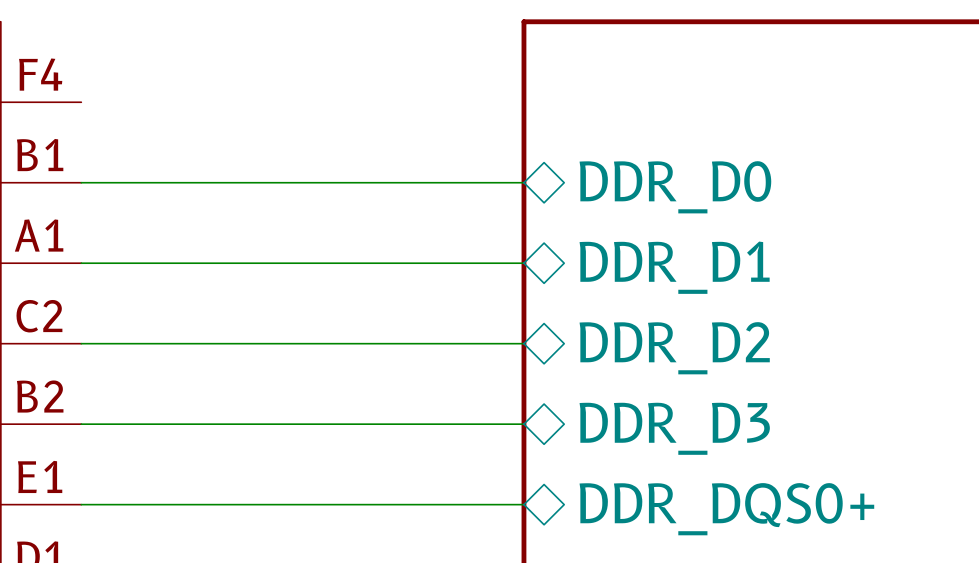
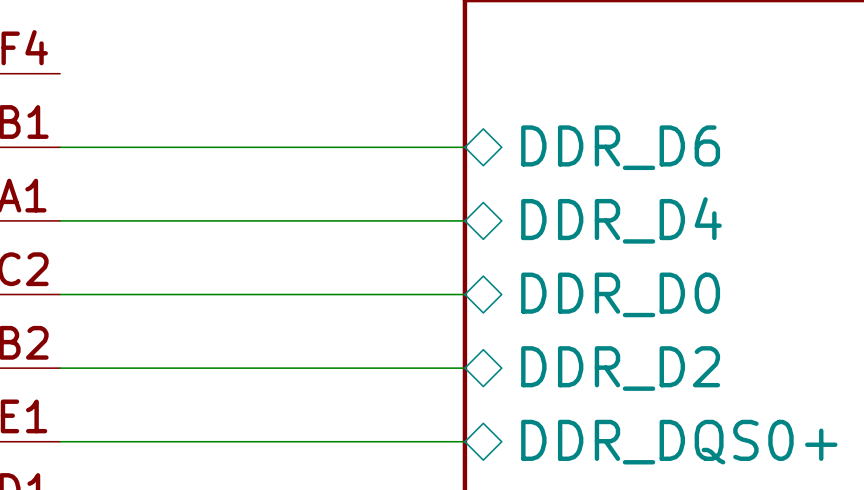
sheet pin: DDR_D0 (675, 187) -> DDR_D6 (620, 147)
sheet pin: DDR_D1 (674, 267) -> DDR_D4 (621, 220)
sheet pin: DDR_D2 (674, 348) -> DDR_D0 (620, 294)
sheet pin: DDR_D3 (674, 428) -> DDR_D2 (620, 368)

